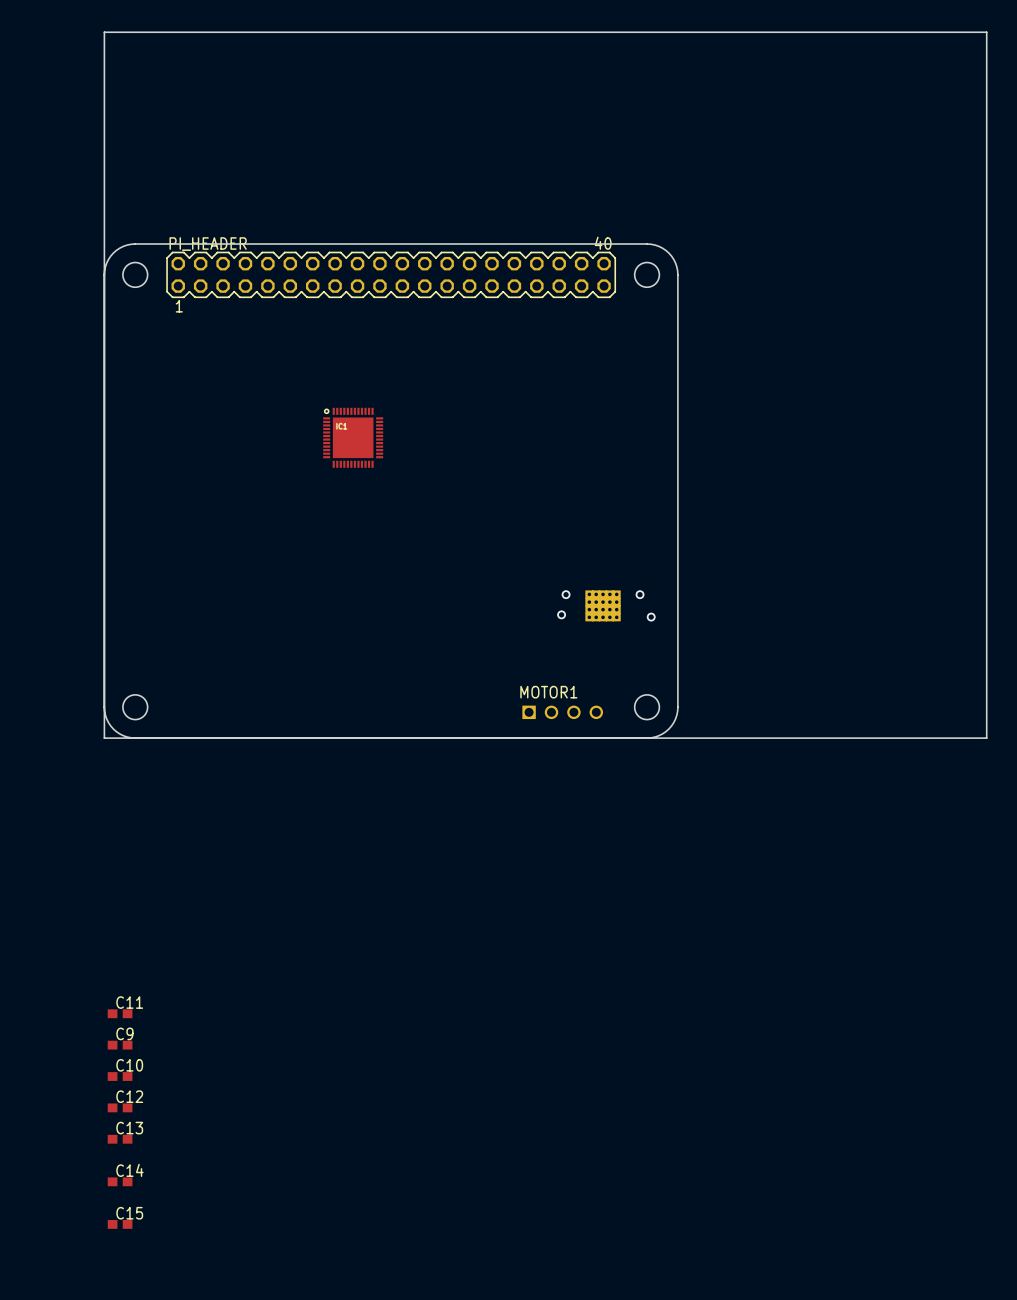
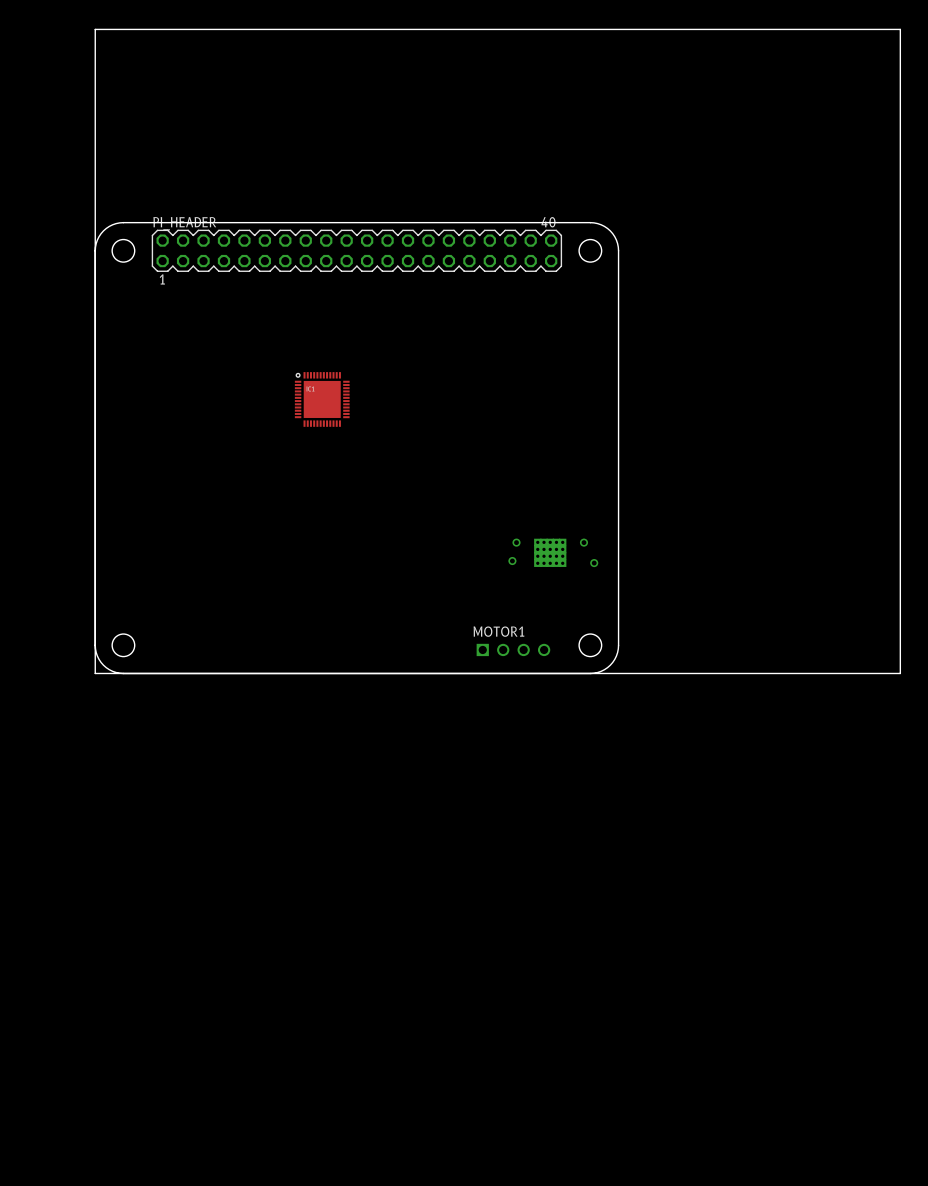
C11: (120, 1013) -> none
C9: (120, 1045) -> none
C10: (120, 1076) -> none
C12: (120, 1107) -> none
C13: (120, 1139) -> none
C14: (120, 1181) -> none
C15: (120, 1224) -> none

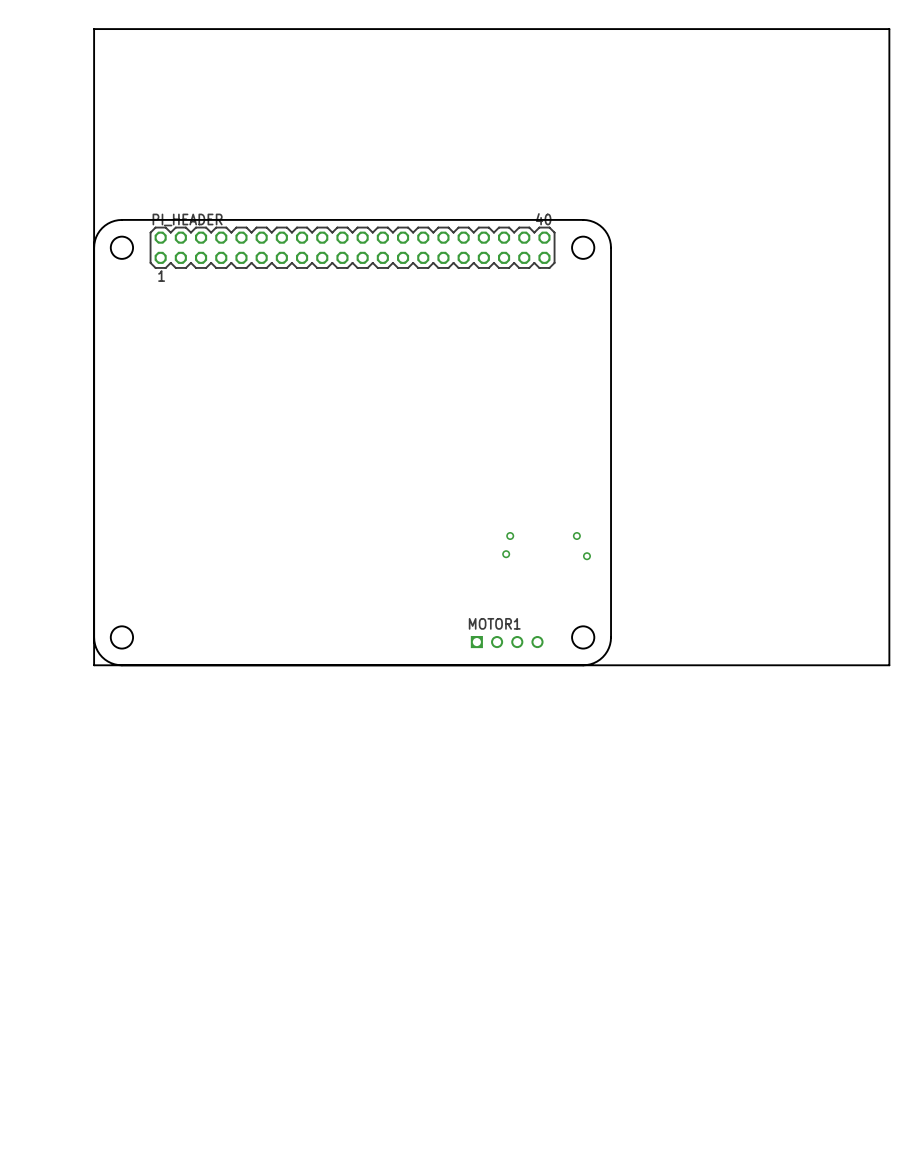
part: (322, 399) -> none
part: (550, 552) -> none

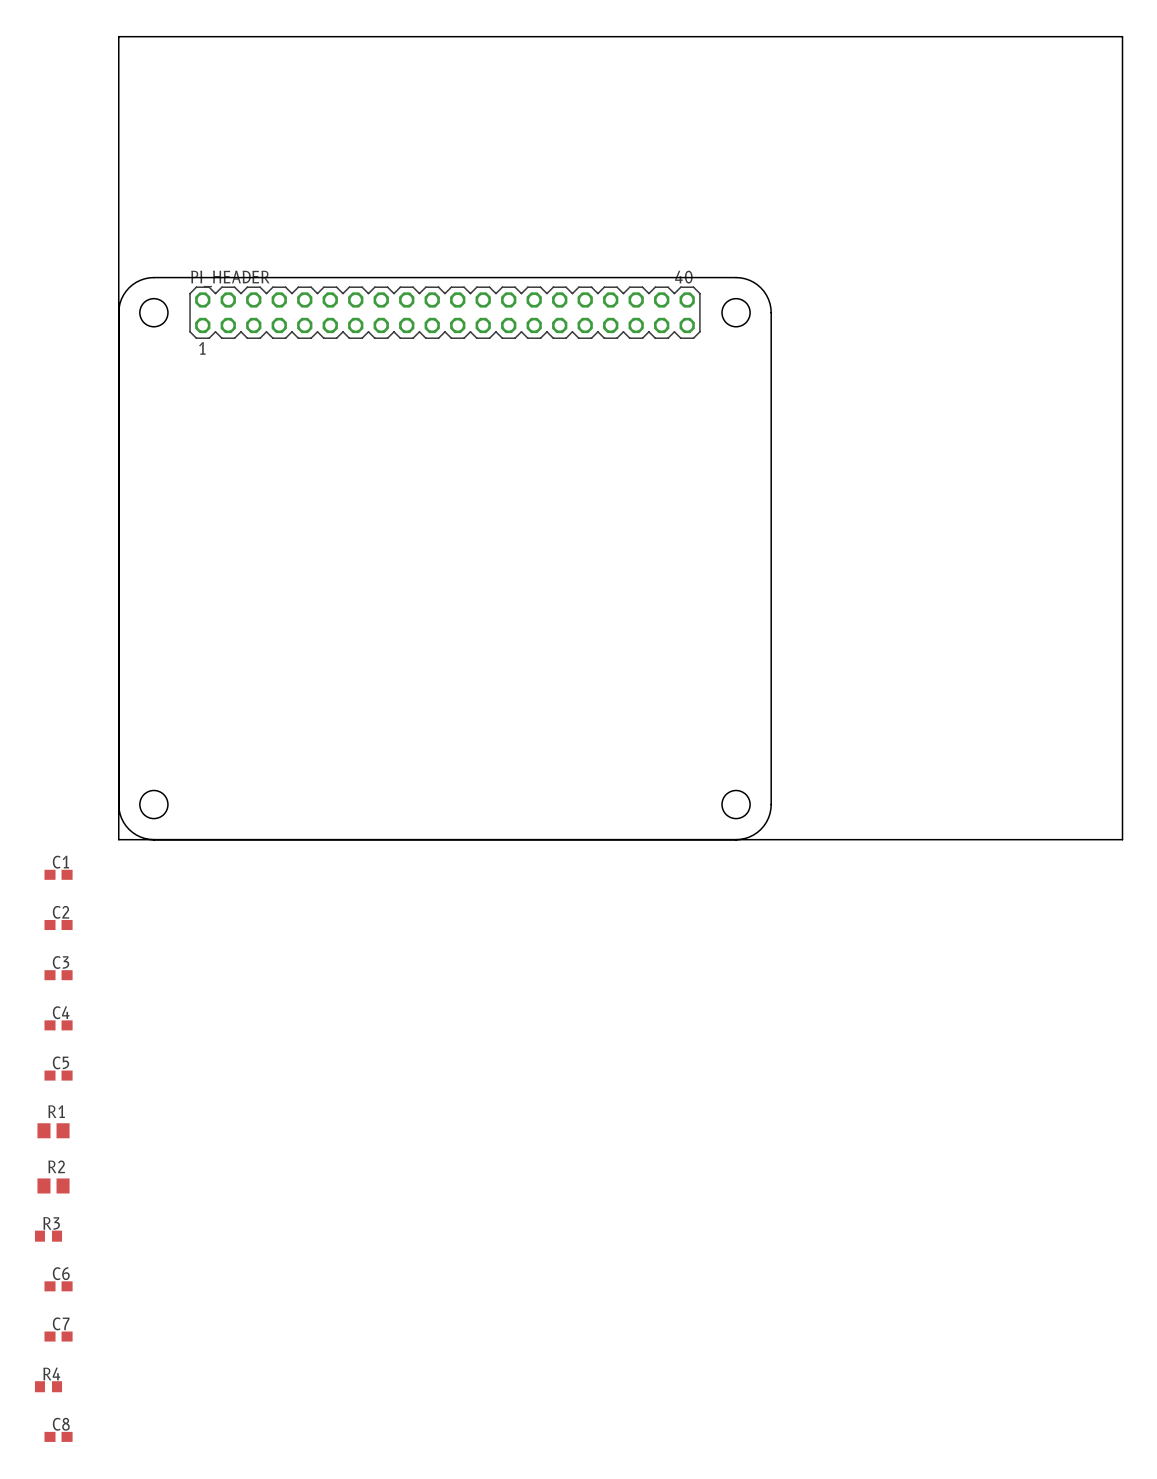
via: (510, 536) -> none
via: (576, 536) -> none
via: (506, 554) -> none
via: (586, 556) -> none
MOTOR1: (507, 642) -> none
C1: none -> (58, 874)
C2: none -> (58, 924)
C3: none -> (58, 975)
C4: none -> (58, 1025)
C5: none -> (58, 1075)
R1: none -> (53, 1130)
R2: none -> (53, 1185)
R3: none -> (48, 1236)
C6: none -> (58, 1286)
C7: none -> (58, 1336)
R4: none -> (48, 1386)
C8: none -> (58, 1436)

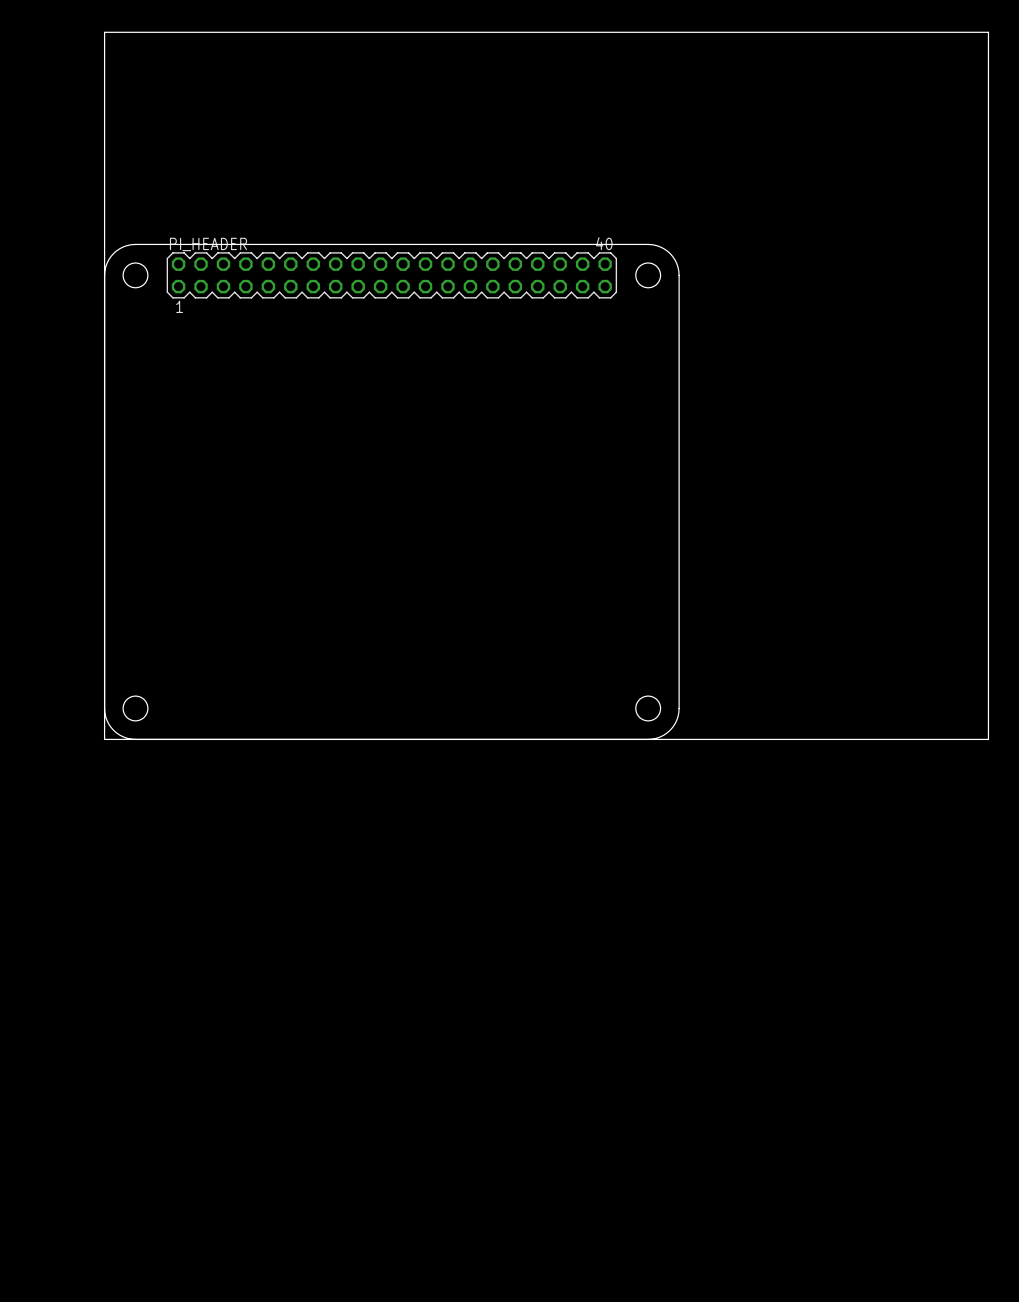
C1: (58, 874) -> none
C2: (58, 924) -> none
C3: (58, 975) -> none
C4: (58, 1025) -> none
C5: (58, 1075) -> none
R1: (53, 1130) -> none
R2: (53, 1185) -> none
R3: (48, 1236) -> none
C6: (58, 1286) -> none
C7: (58, 1336) -> none
R4: (48, 1386) -> none
C8: (58, 1436) -> none

